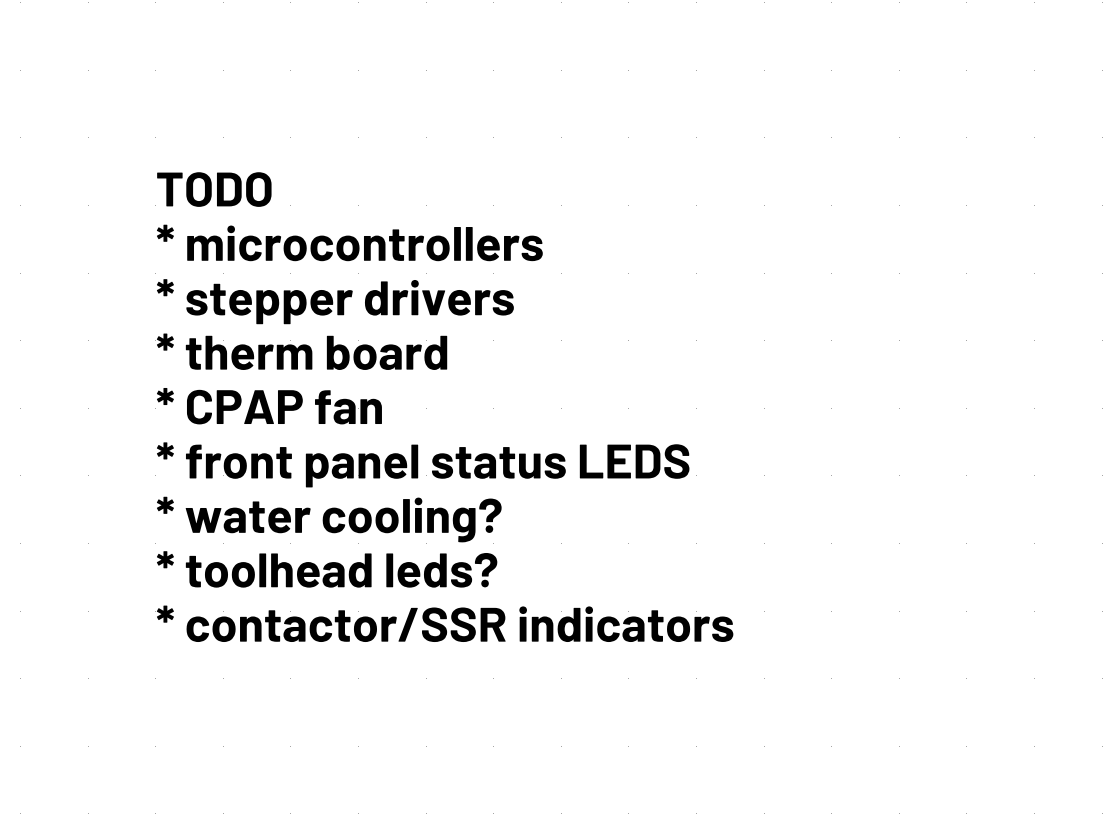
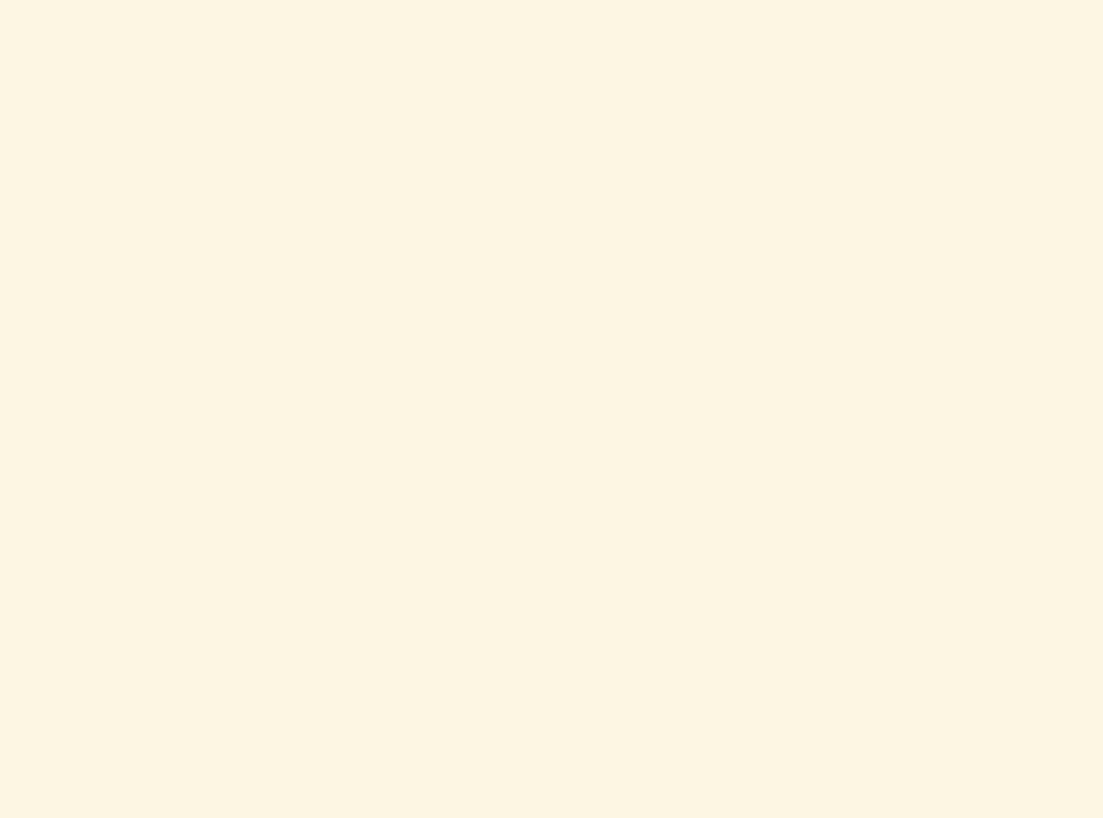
text: TODO (214, 189) -> none
text: * microcontrollers (349, 242) -> none
text: * stepper drivers (335, 301) -> none
text: * therm board (302, 351) -> none
text: * CPAP fan (269, 406) -> none
text: * front panel status LEDS (423, 464) -> none
text: * water cooling? (329, 519) -> none
text: * toolhead leds? (327, 569) -> none
text: * contactor/SSR indicators (445, 623) -> none

